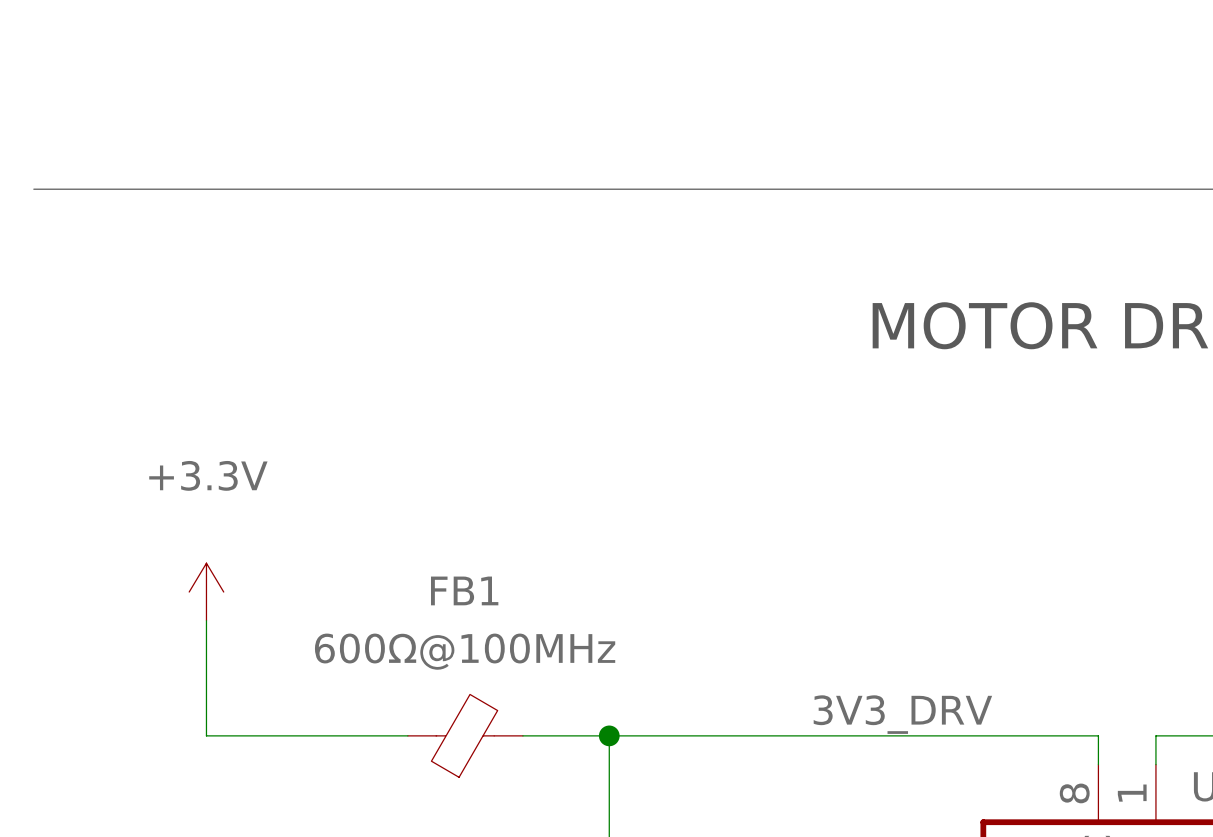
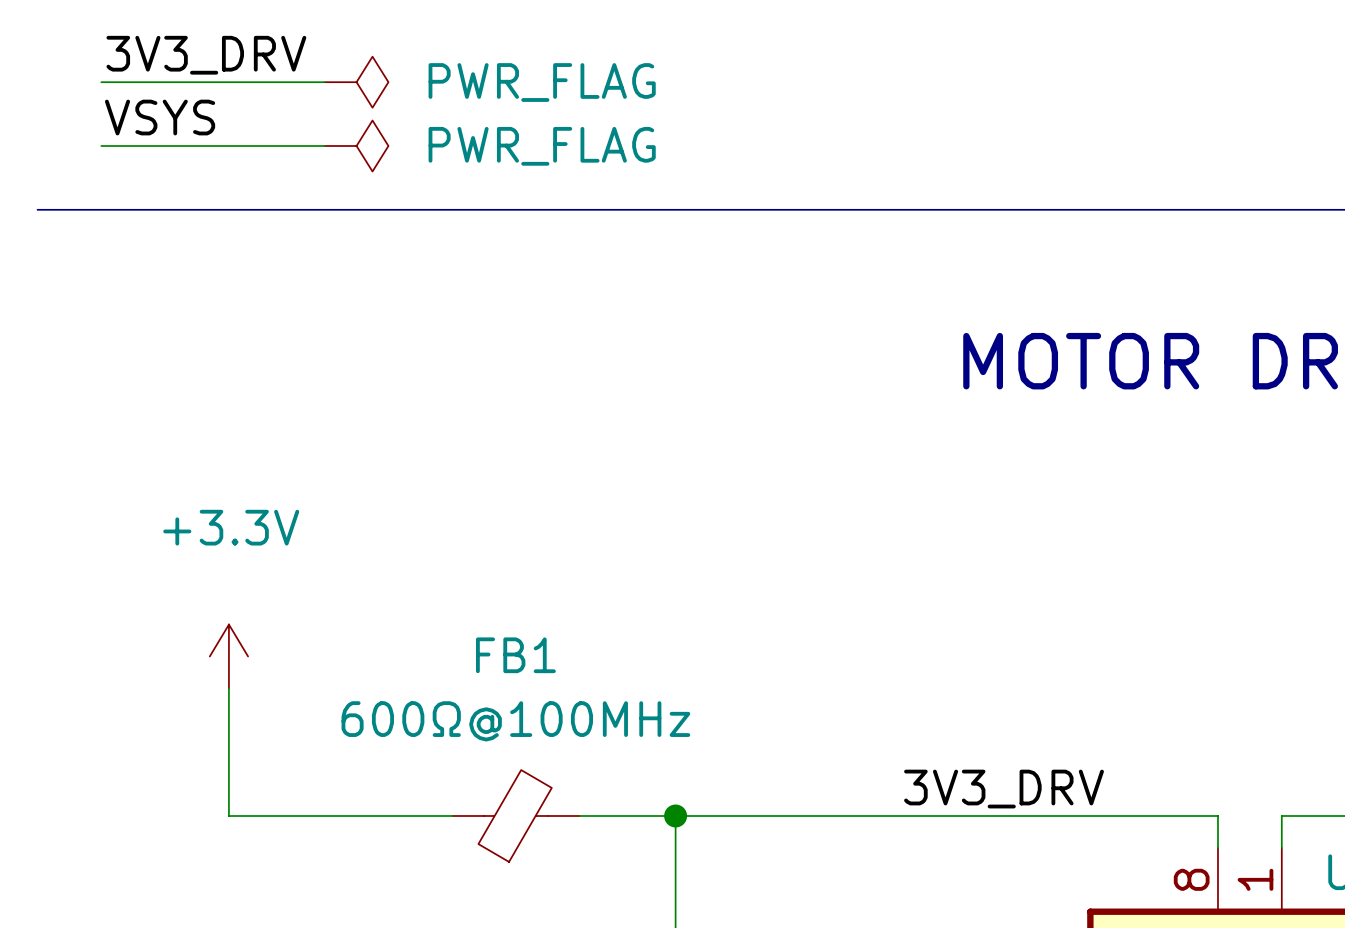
label: none -> 3V3_DRV (206, 55)
wire: none -> (101, 82) (324, 82)
power symbol: none -> PWR_FLAG (356, 82)
label: none -> VSYS (160, 117)
wire: none -> (101, 145) (324, 145)
power symbol: none -> PWR_FLAG (356, 145)

